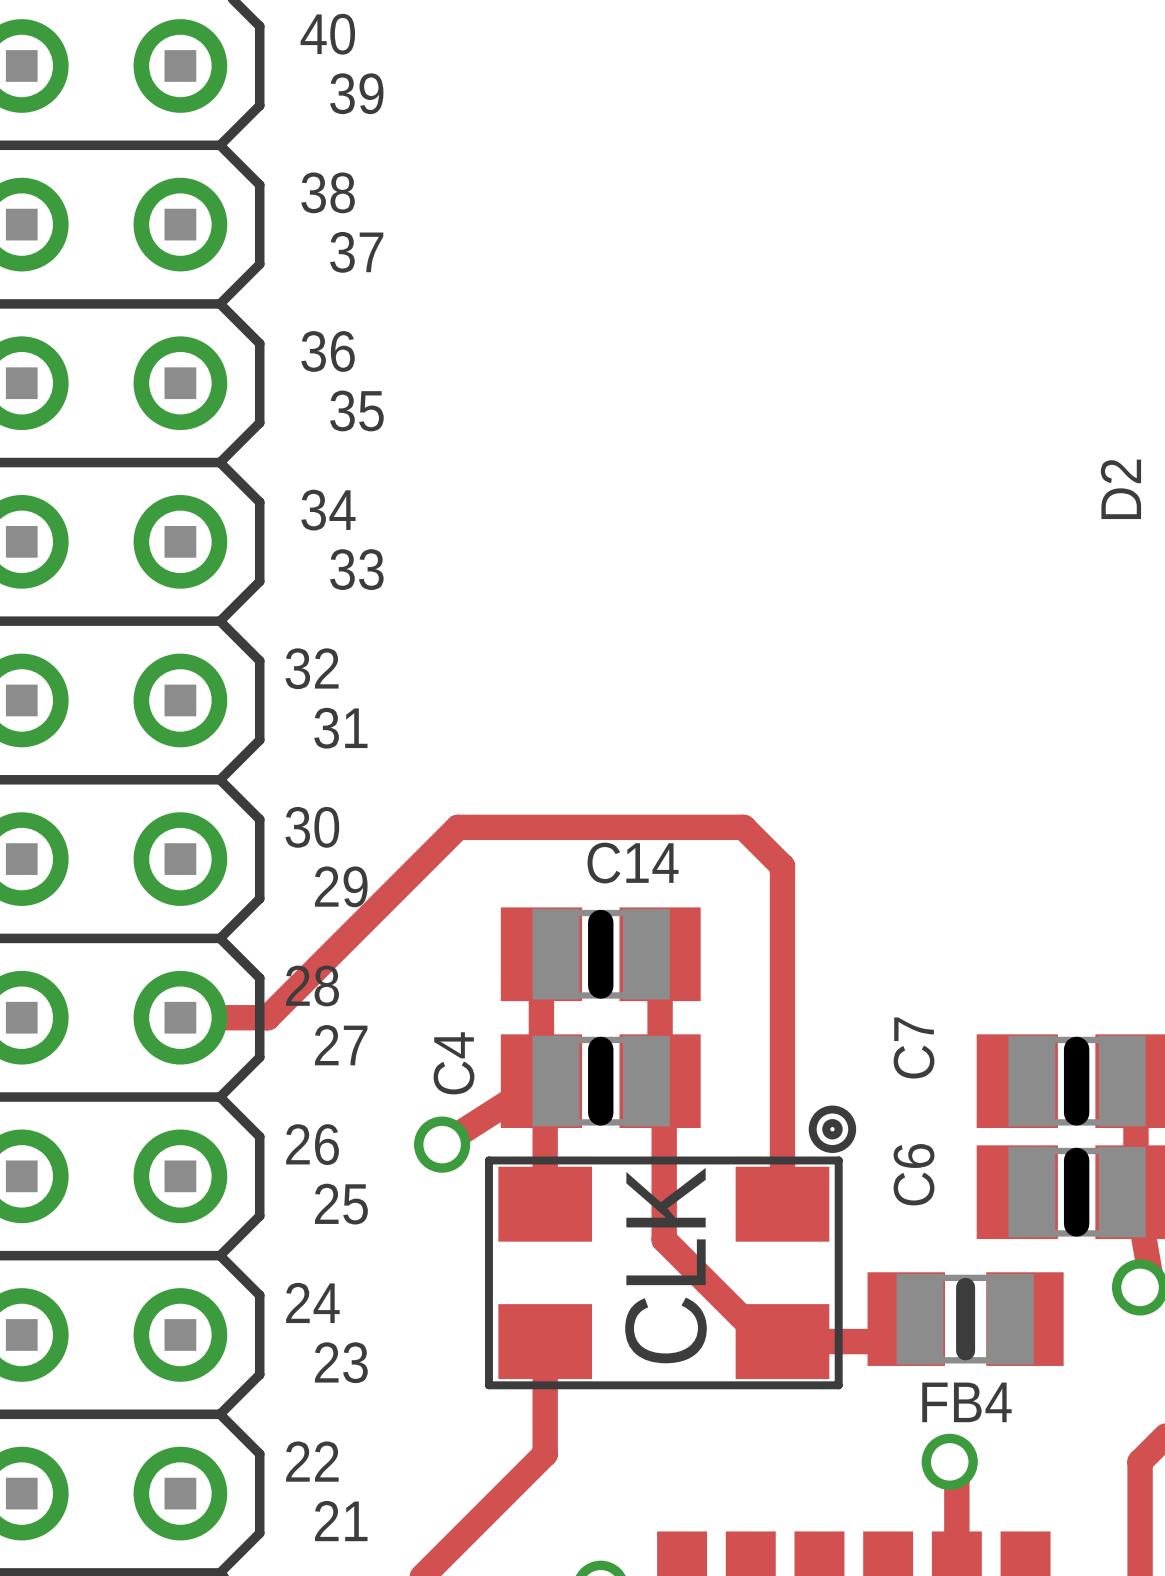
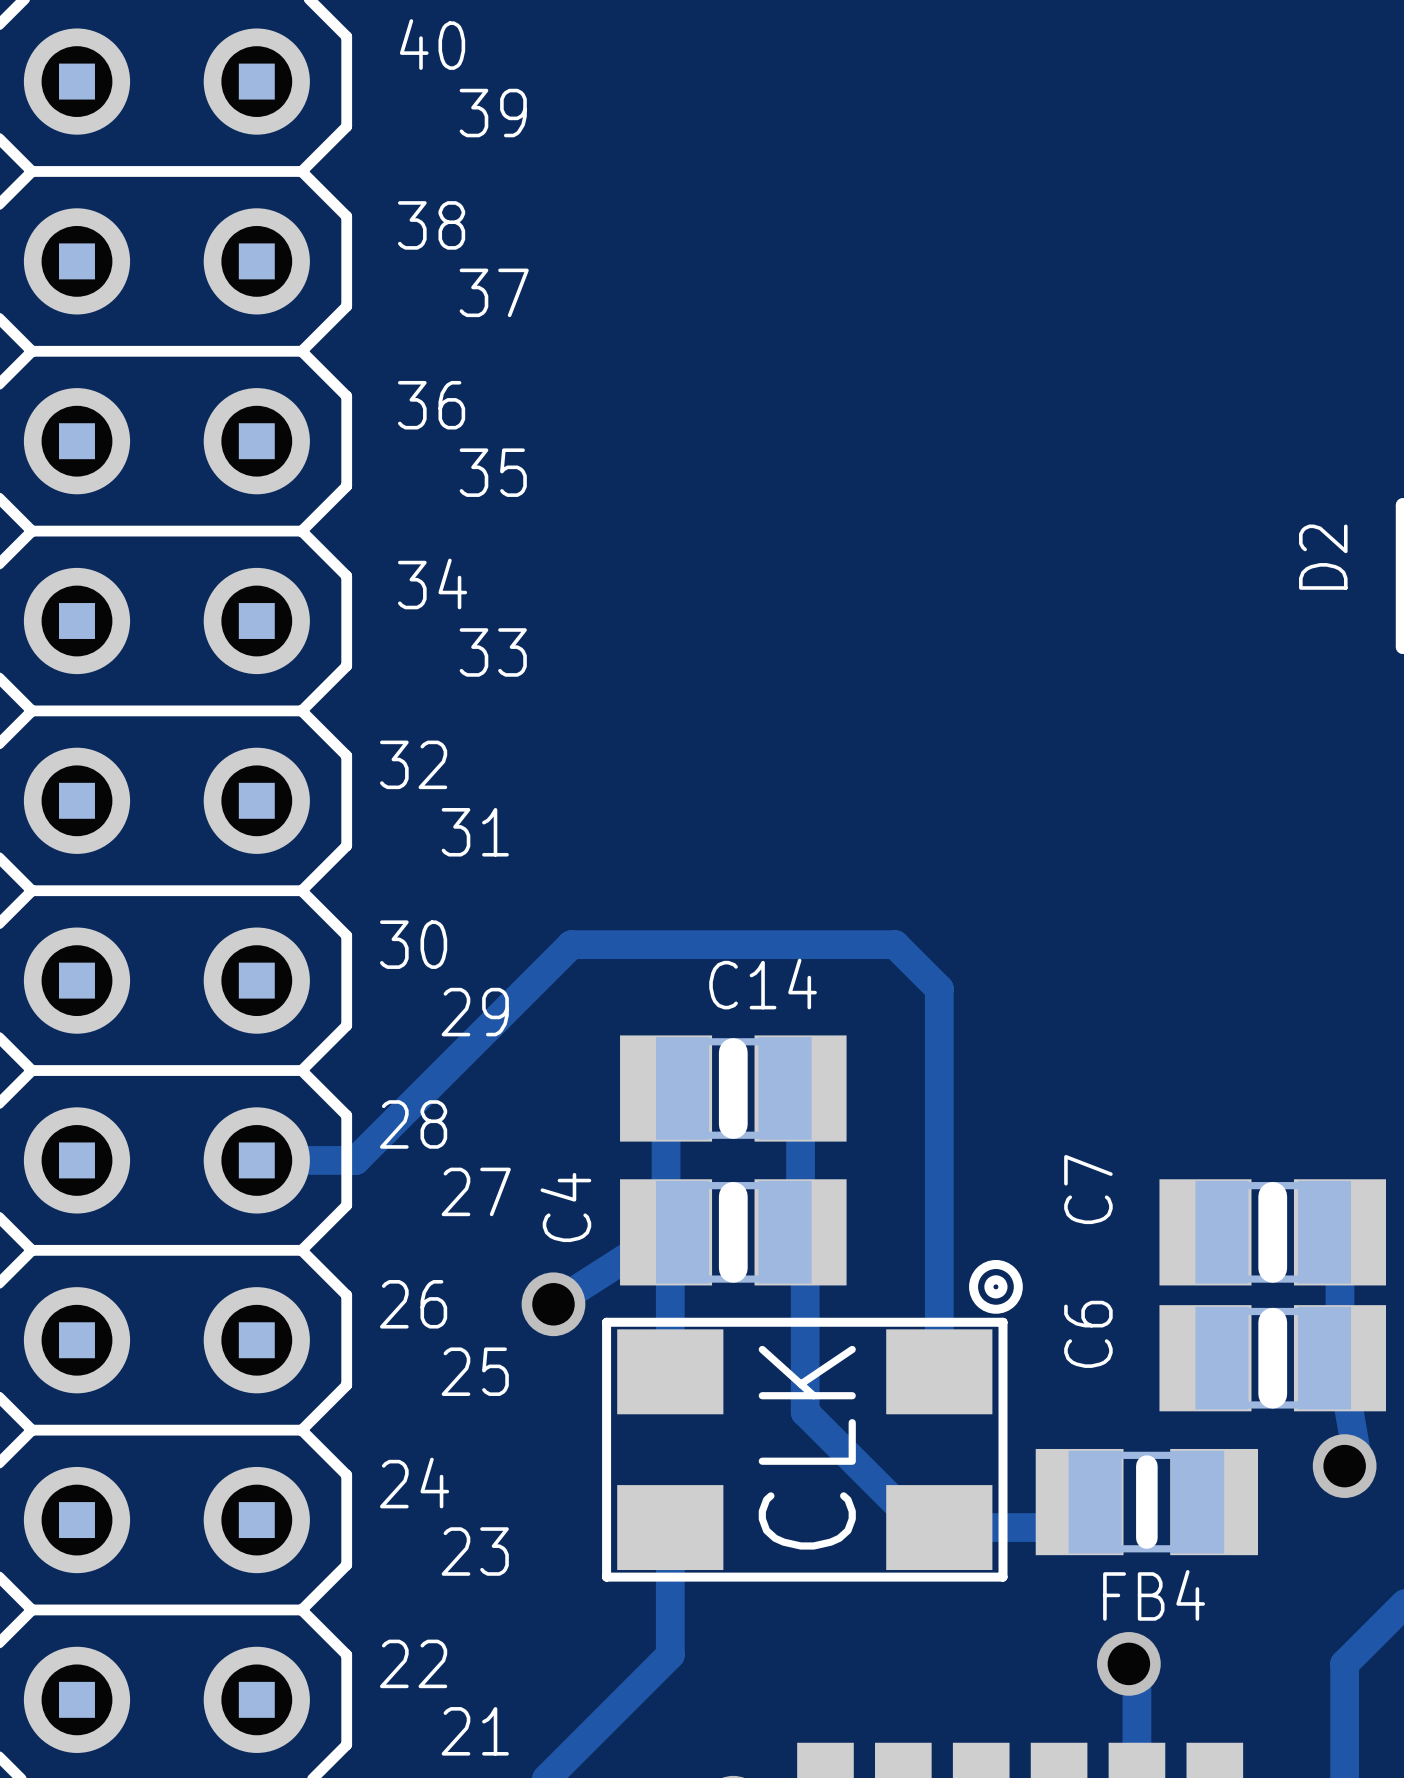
board edge: (600, 922) (600, 985) -> none
line: none -> (733, 1052) (733, 1124)
board edge: (600, 1049) (600, 1112) -> none
line: none -> (733, 1196) (733, 1268)
board edge: (1076, 1049) (1076, 1112) -> none
line: none -> (1272, 1196) (1272, 1268)
board edge: (1076, 1160) (1076, 1223) -> none
line: none -> (1272, 1322) (1272, 1394)

